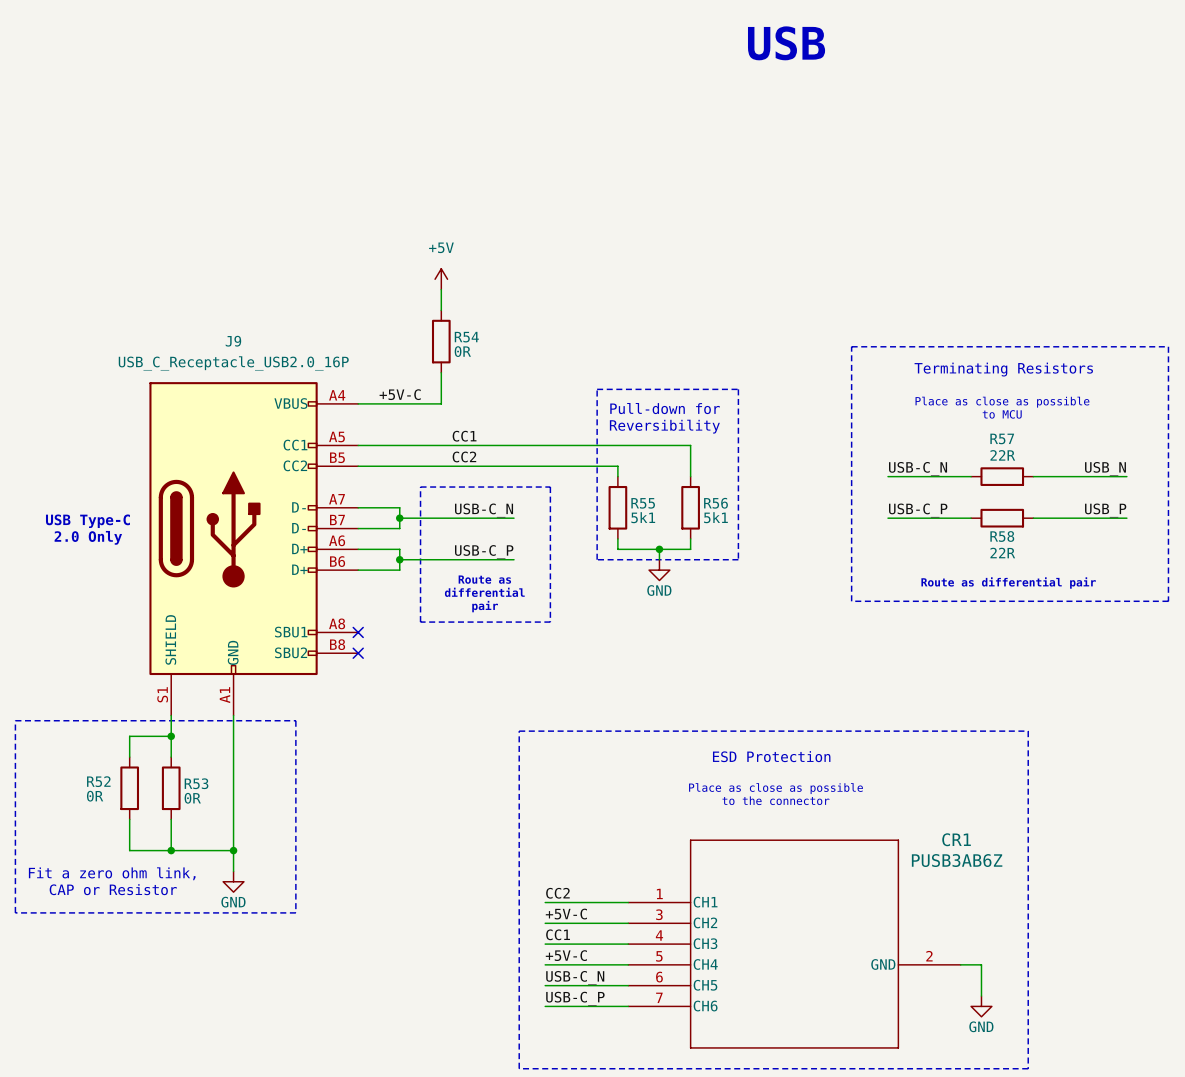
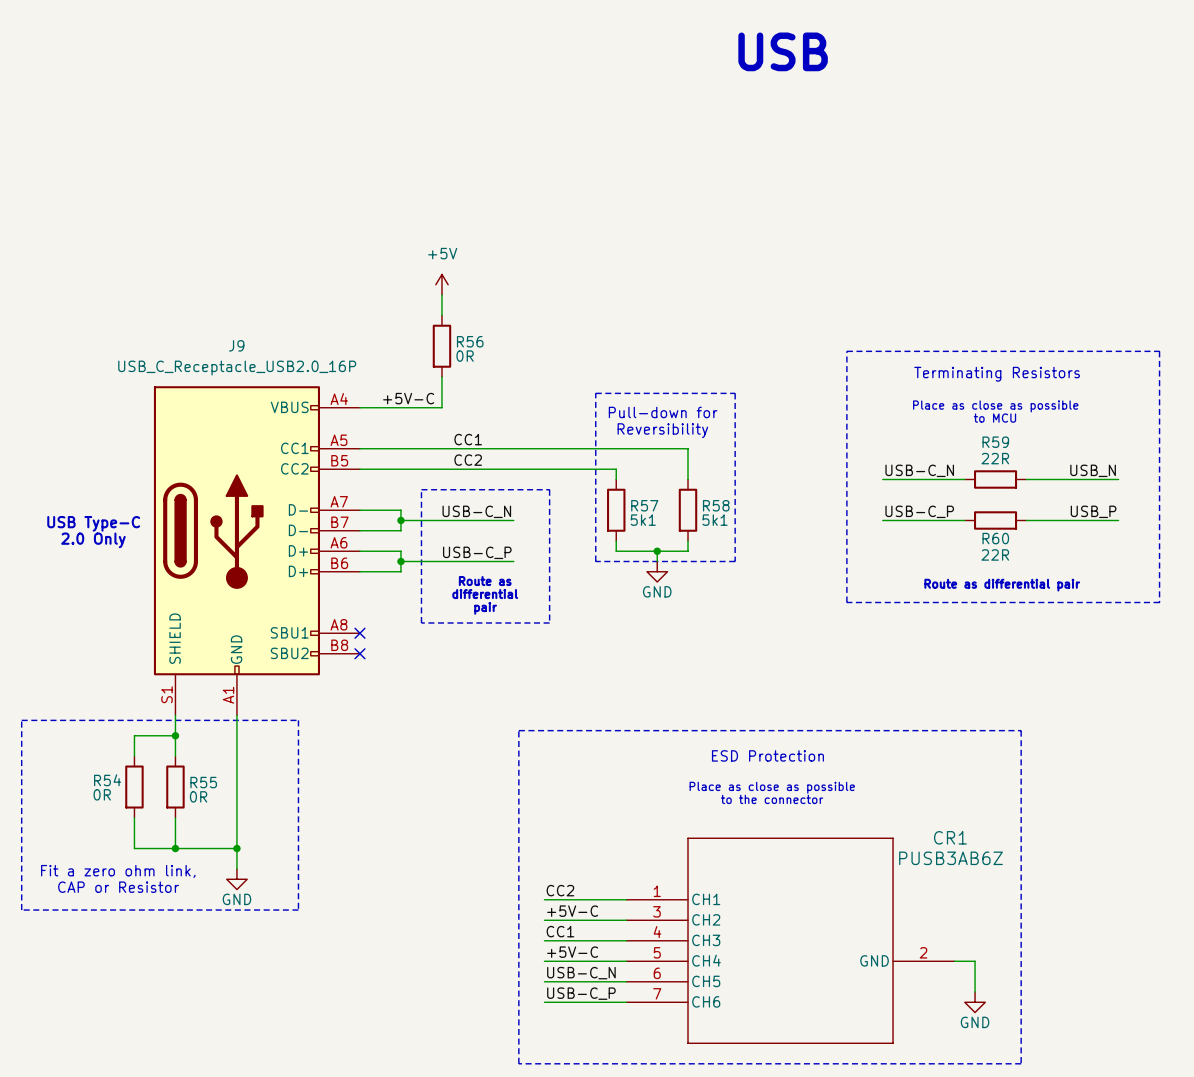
R54 name: R54 (466, 337) -> R56 (470, 341)
R57 name: R57 (1002, 438) -> R59 (995, 442)
R55 name: R55 (643, 503) -> R57 (644, 505)
R56 name: R56 (715, 503) -> R58 (716, 505)
R58 name: R58 (1002, 536) -> R60 (995, 538)
R52 name: R52 (98, 781) -> R54 (107, 780)
R53 name: R53 (196, 783) -> R55 (203, 782)

